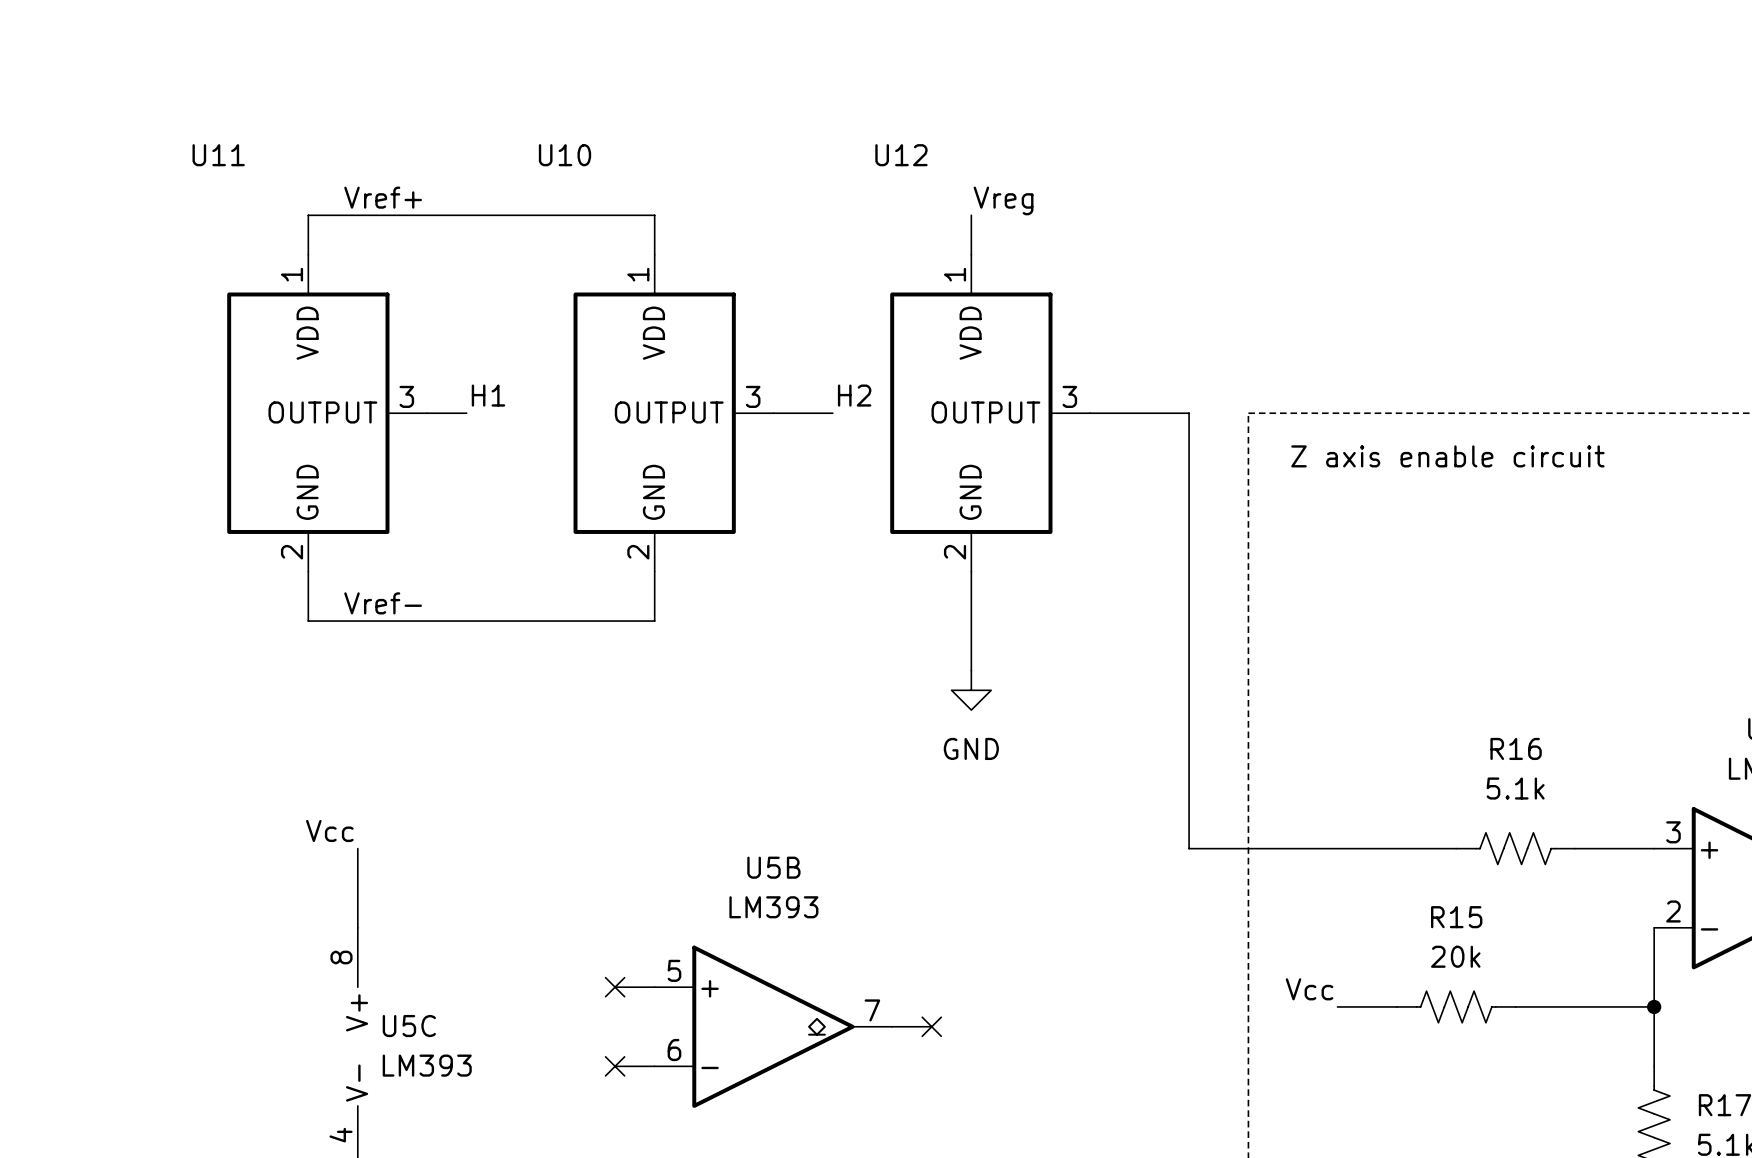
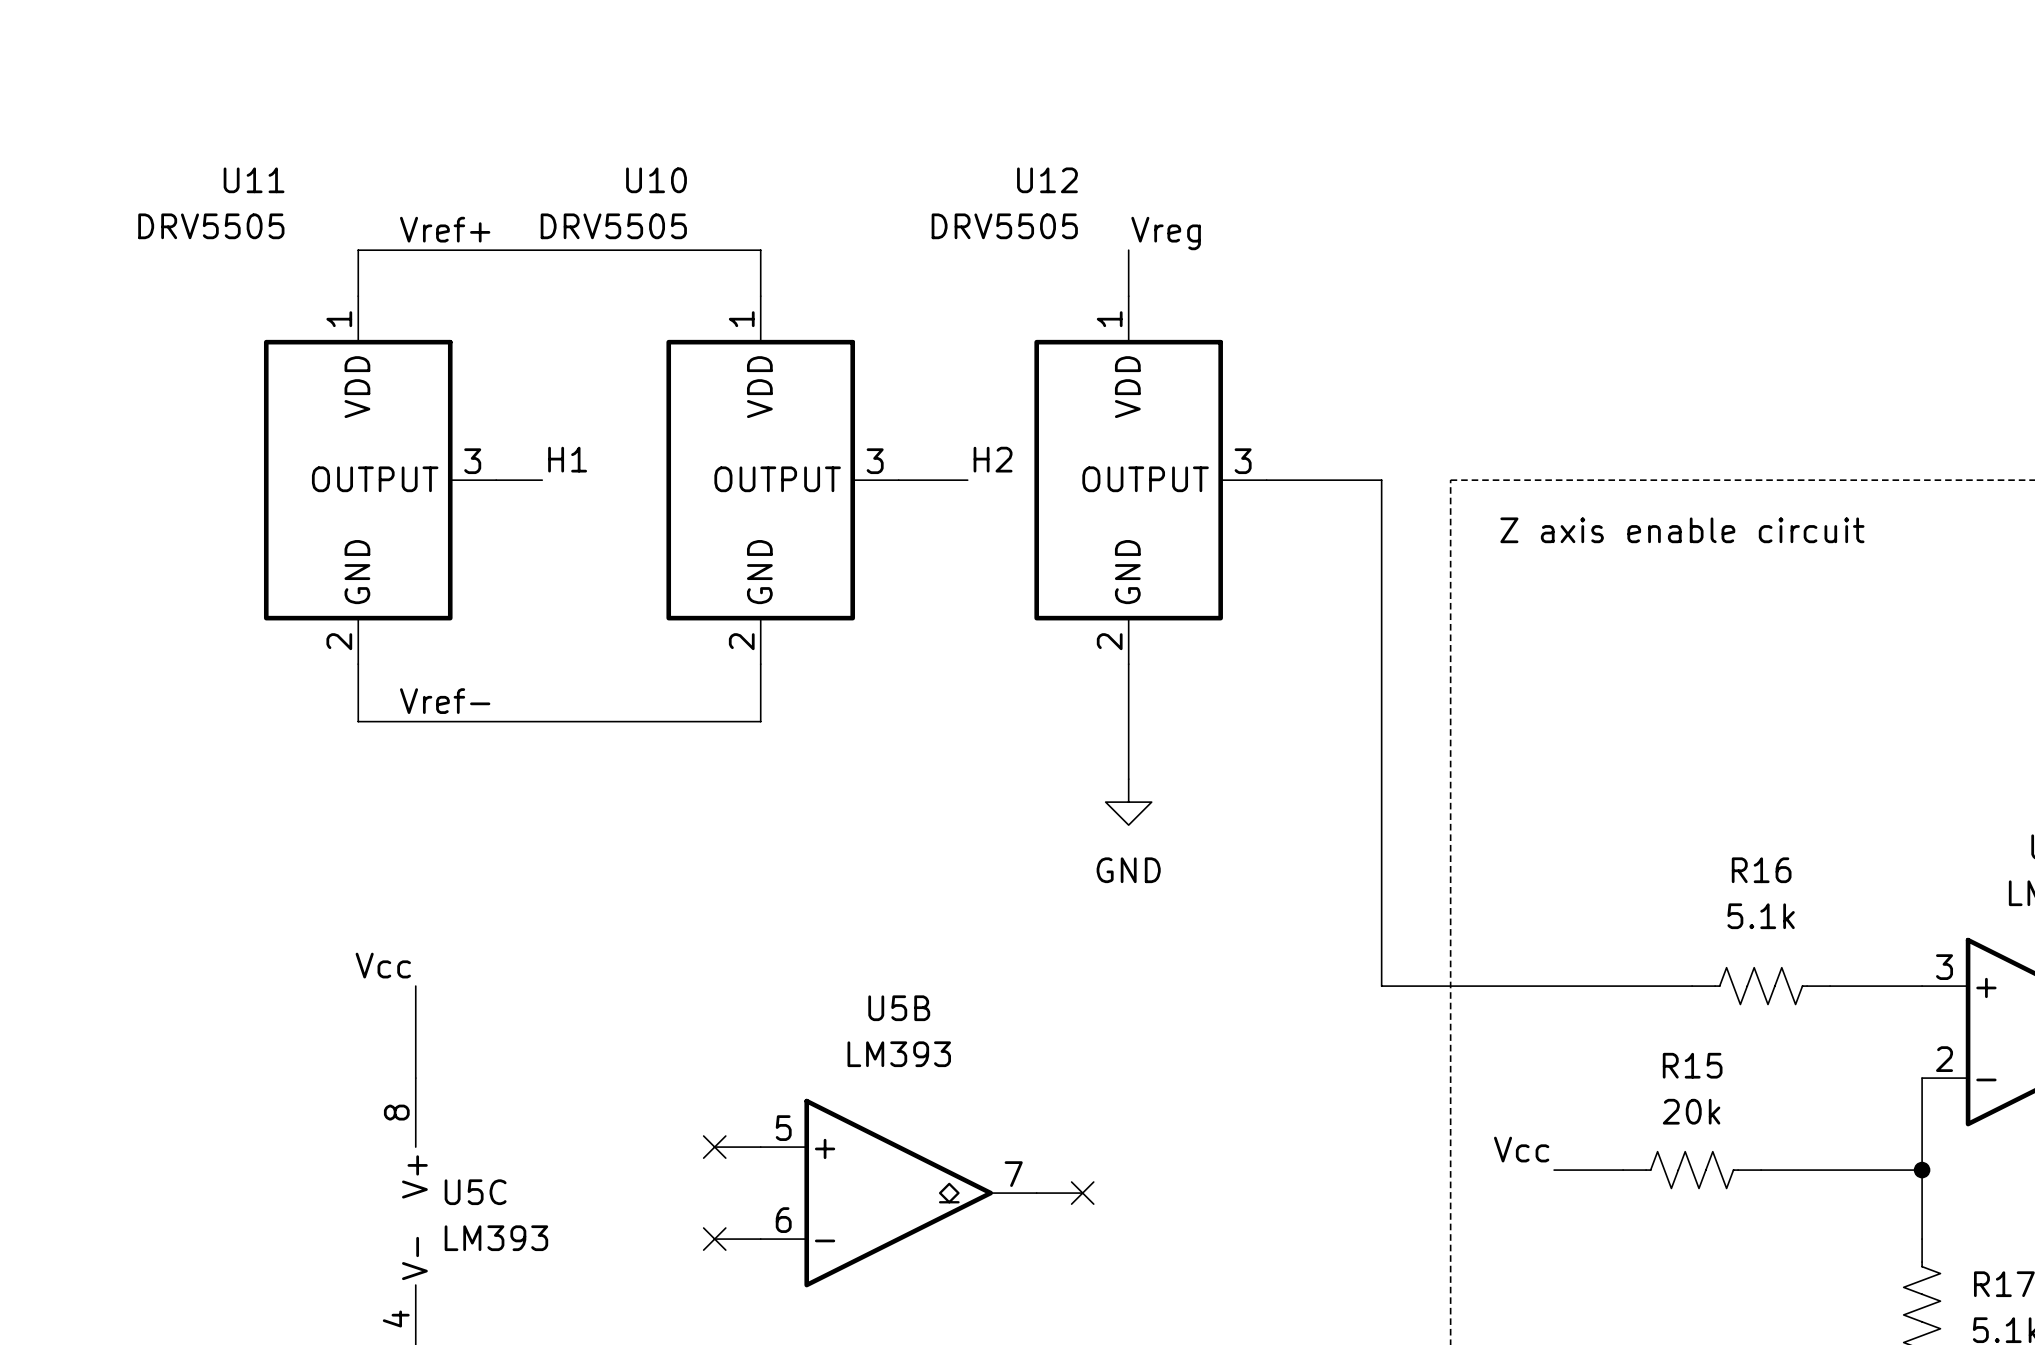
U11 value: none -> DRV5505 (211, 226)
U10 value: none -> DRV5505 (613, 226)
U12 value: none -> DRV5505 (1004, 226)

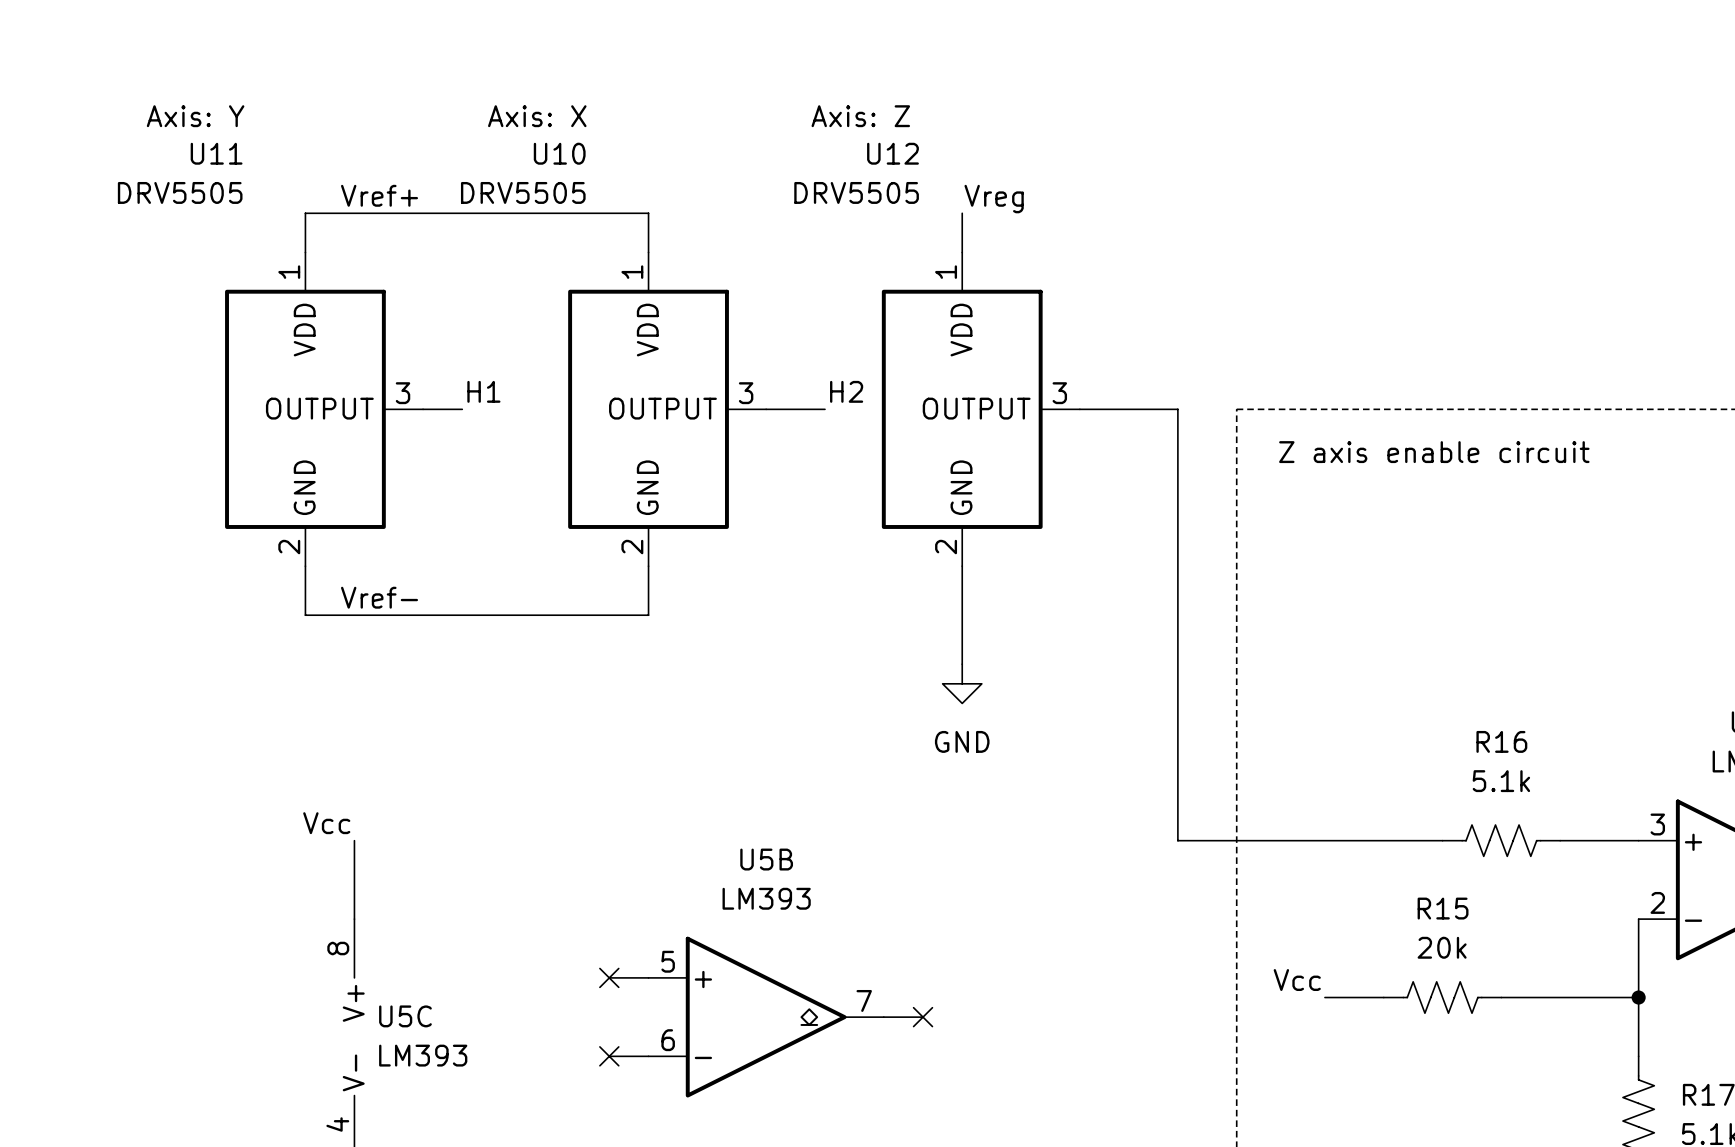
U11 text: none -> Axis: Y (195, 116)
U10 text: none -> Axis: X (537, 116)
U12 text: none -> Axis: Z (860, 116)

